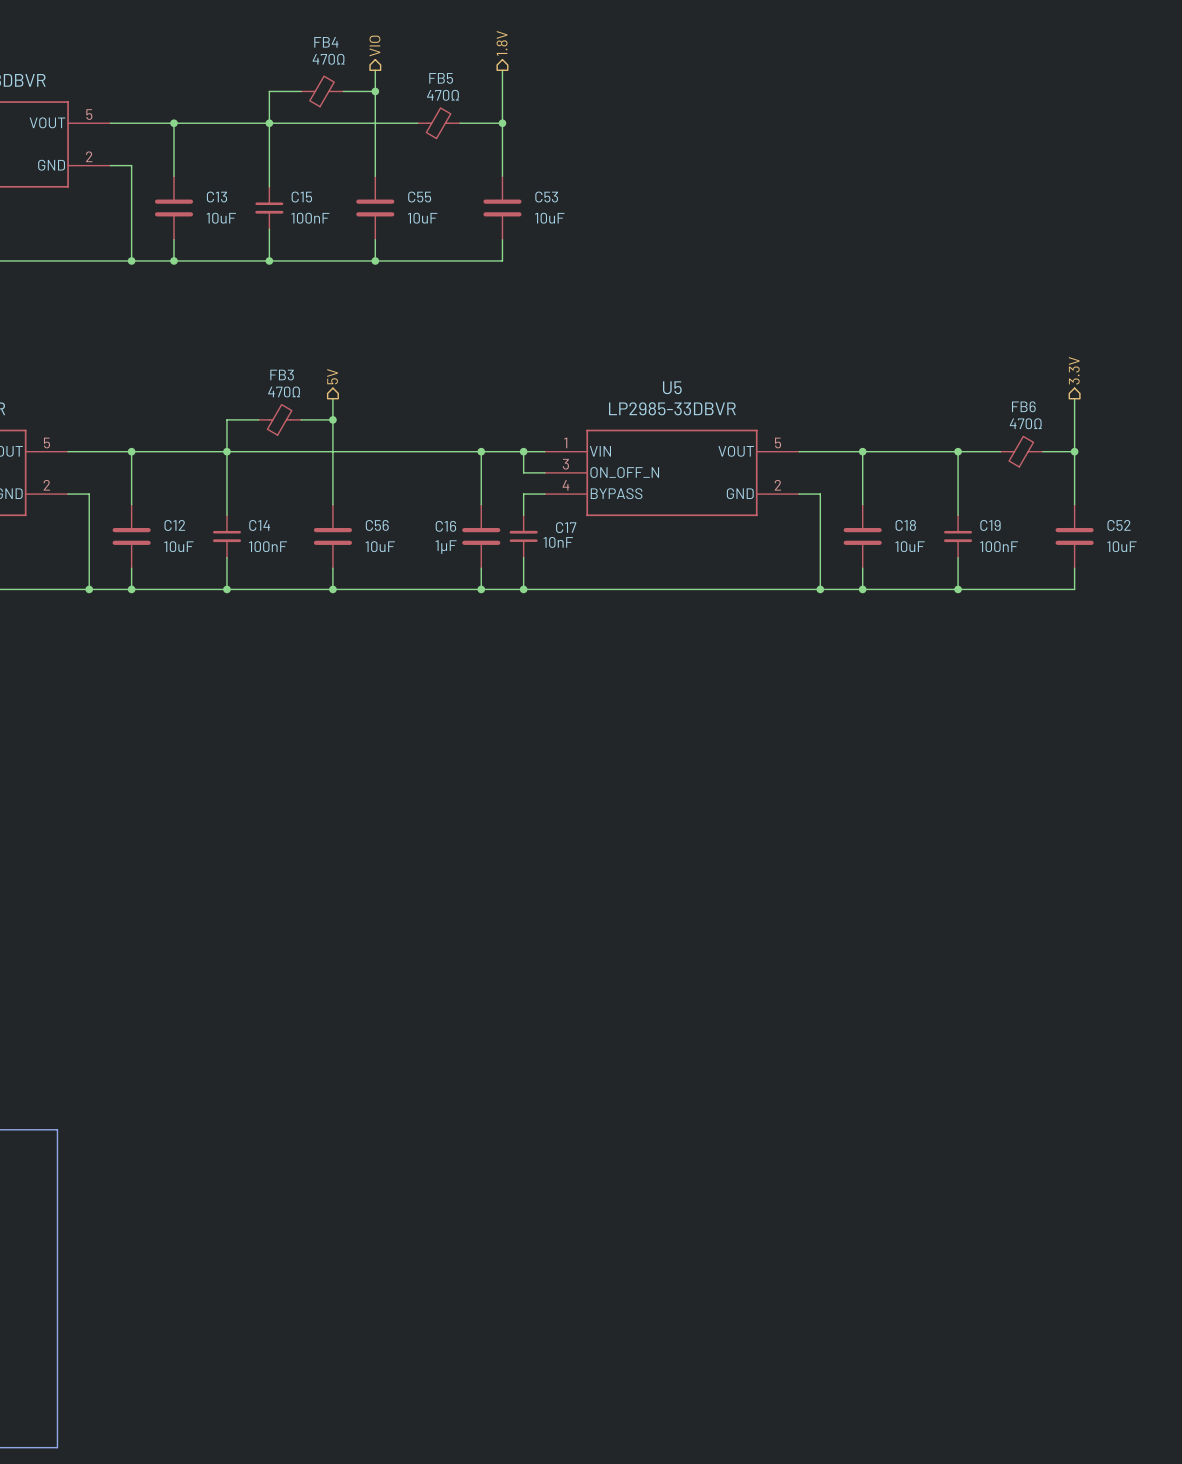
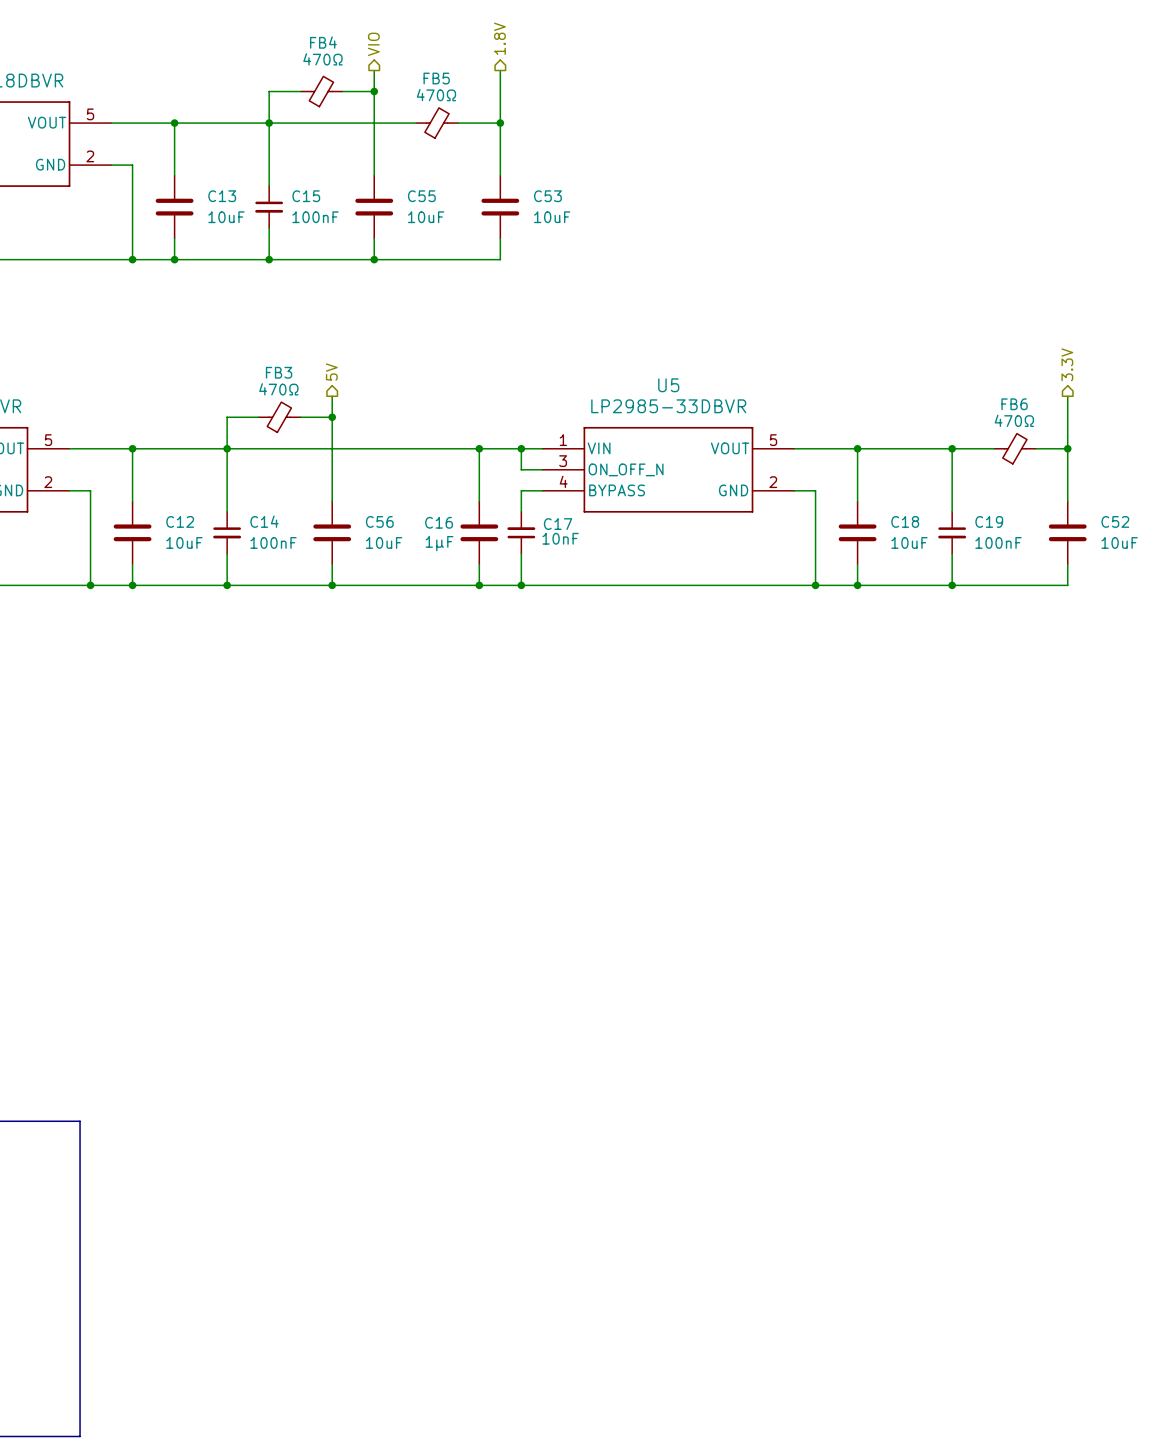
line: (57, 1129) (57, 1447) -> (59, 1121) (80, 1121) (80, 1436) (59, 1436)

